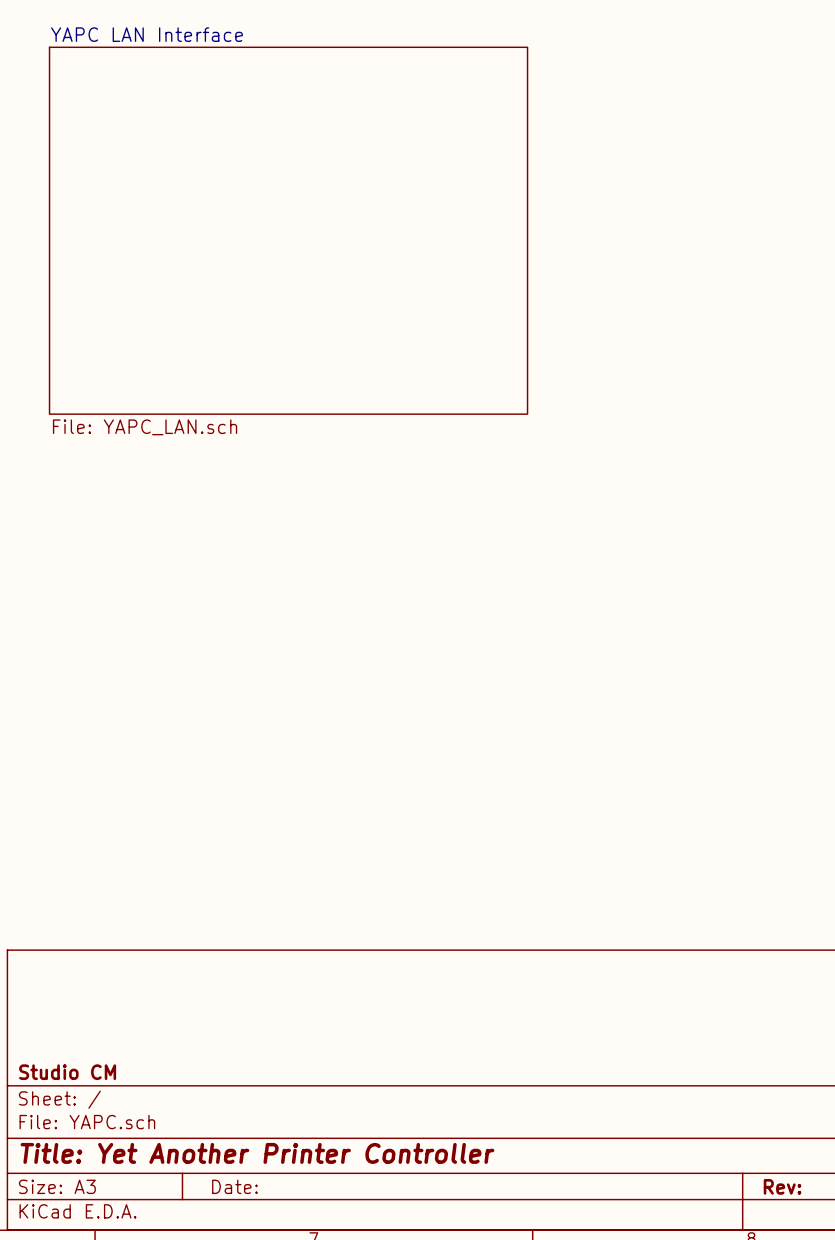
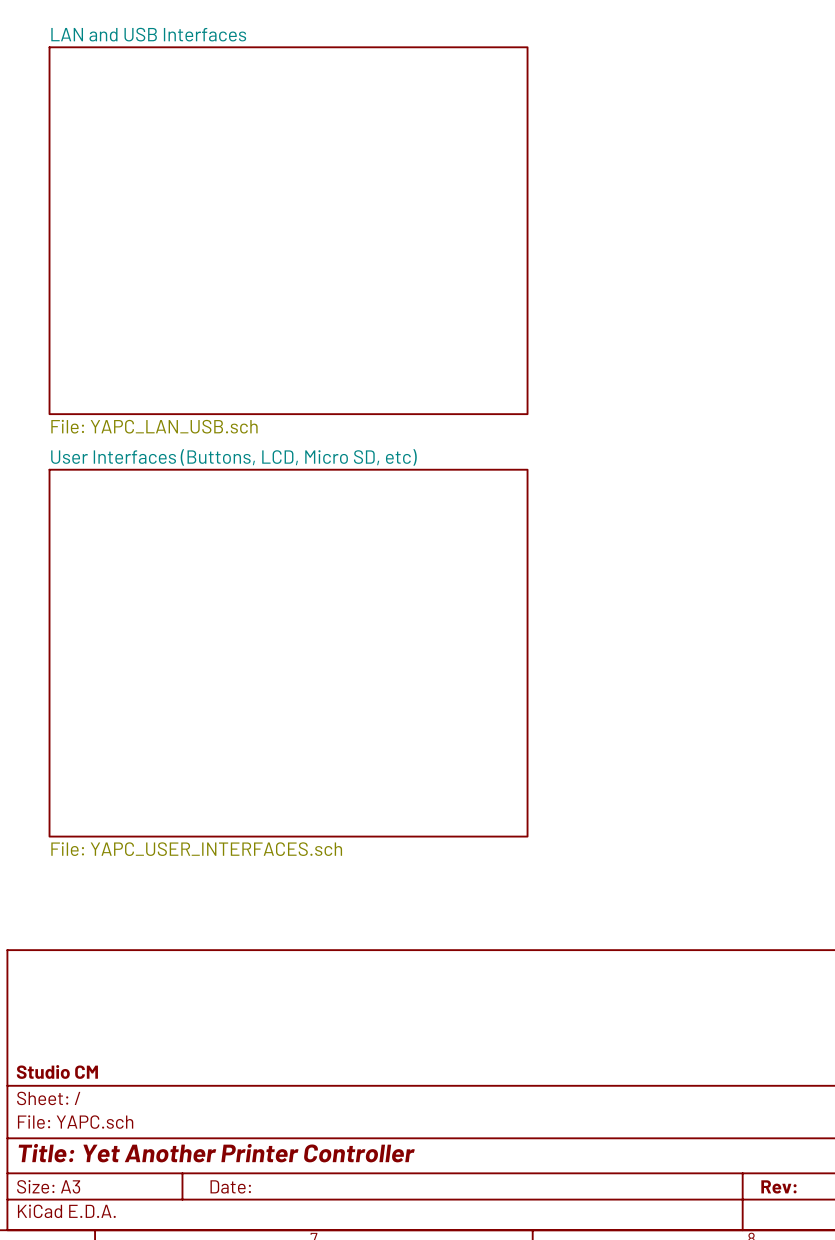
sheet YAPC LAN Interface name: YAPC LAN Interface (146, 34) -> LAN and USB Interfaces (148, 34)
sheet YAPC LAN Interface value: File: YAPC_LAN.sch (145, 427) -> File: YAPC_LAN_USB.sch (154, 426)
sheet User Interfaces (Buttons, LCD, Micro SD, etc): none -> File: YAPC_USER_INTERFACES.sch (288, 653)

